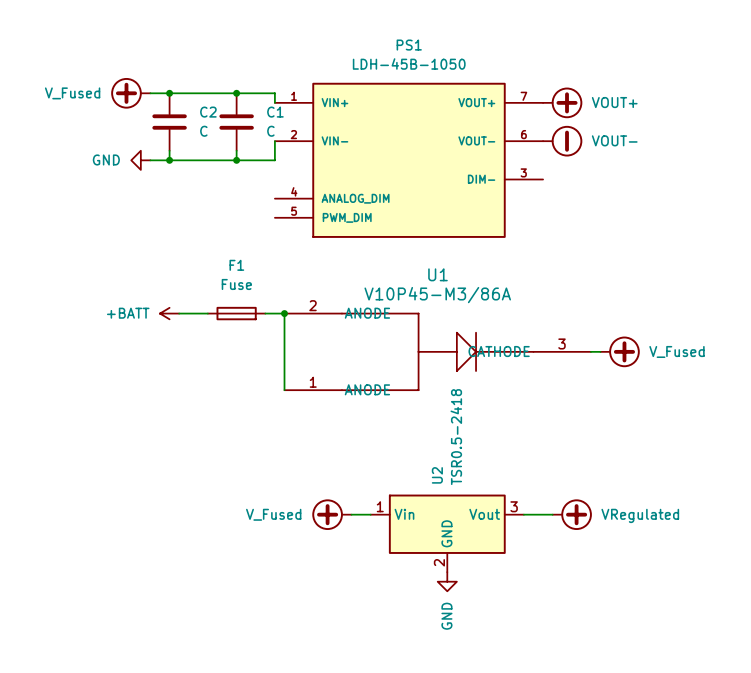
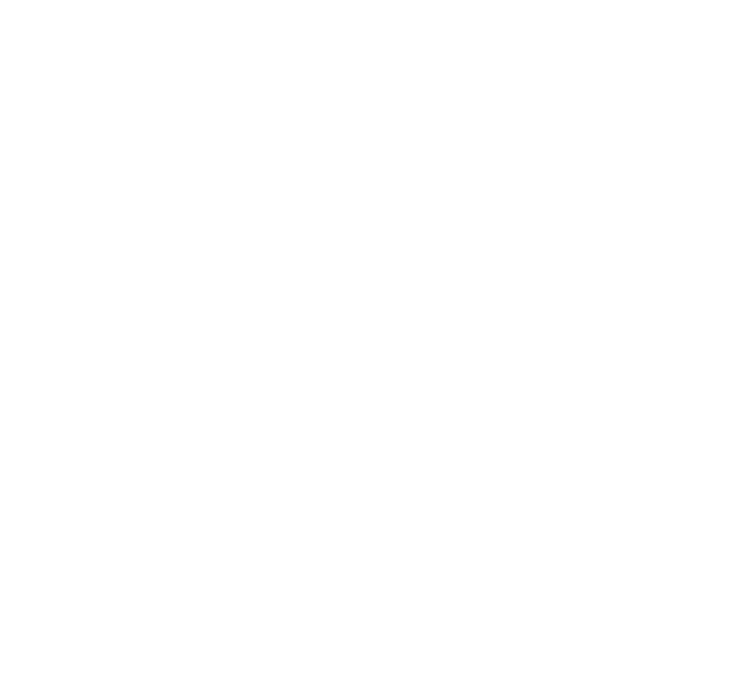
power symbol: V_Fused (130, 93) -> none
wire: (150, 93) (274, 93) (274, 102) -> none
junction: (169, 93) -> none
junction: (236, 93) -> none
power symbol: VOUT+ (562, 102) -> none
C2: C (169, 122) -> none
C1: C (236, 122) -> none
wire: (274, 141) (274, 160) (150, 160) -> none
power symbol: VOUT- (562, 141) -> none
wire: (169, 150) (169, 160) -> none
wire: (236, 150) (236, 160) -> none
power symbol: GND (140, 160) -> none
junction: (169, 160) -> none
junction: (236, 160) -> none
PS1: LDH-45B-1050 (408, 160) -> none
power symbol: +BATT (169, 313) -> none
wire: (179, 313) (207, 313) -> none
F1: Fuse (236, 313) -> none
wire: (265, 313) (284, 313) (284, 390) -> none
junction: (284, 313) -> none
U1: V10P45-M3/86A (437, 351) -> none
wire: (590, 351) (600, 351) -> none
power symbol: V_Fused (620, 351) -> none
power symbol: V_Fused (331, 514) -> none
wire: (351, 514) (370, 514) -> none
wire: (523, 514) (552, 514) -> none
power symbol: VRegulated (572, 514) -> none
U2: TSR0.5-2418 (447, 533) -> none
power symbol: GND (447, 581) -> none

